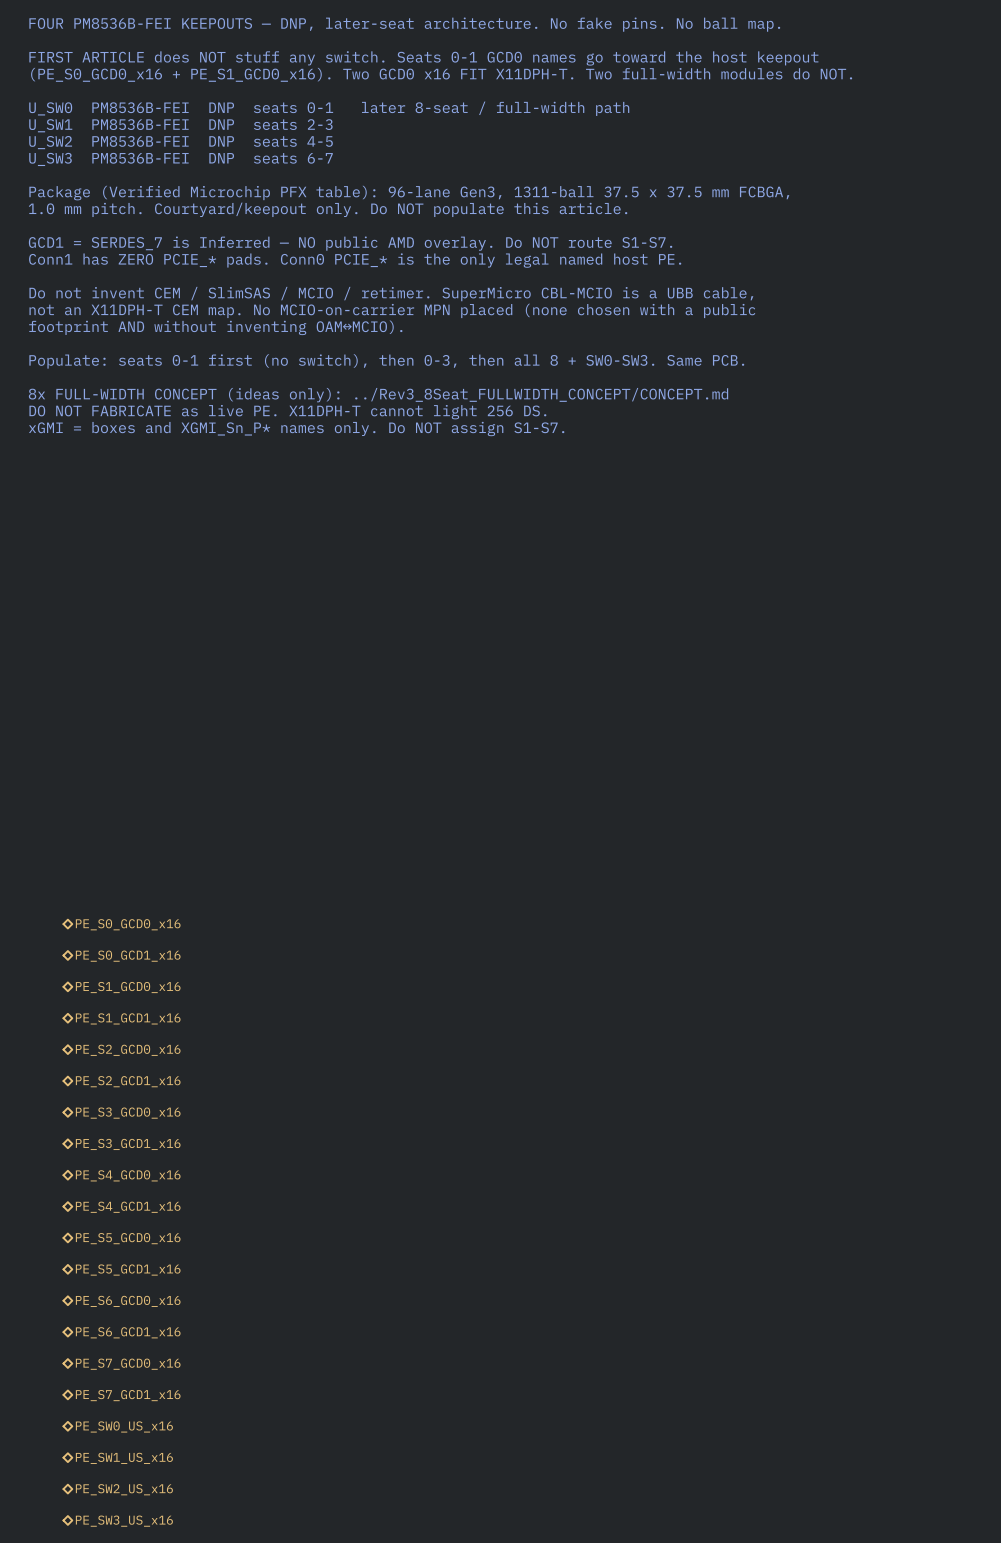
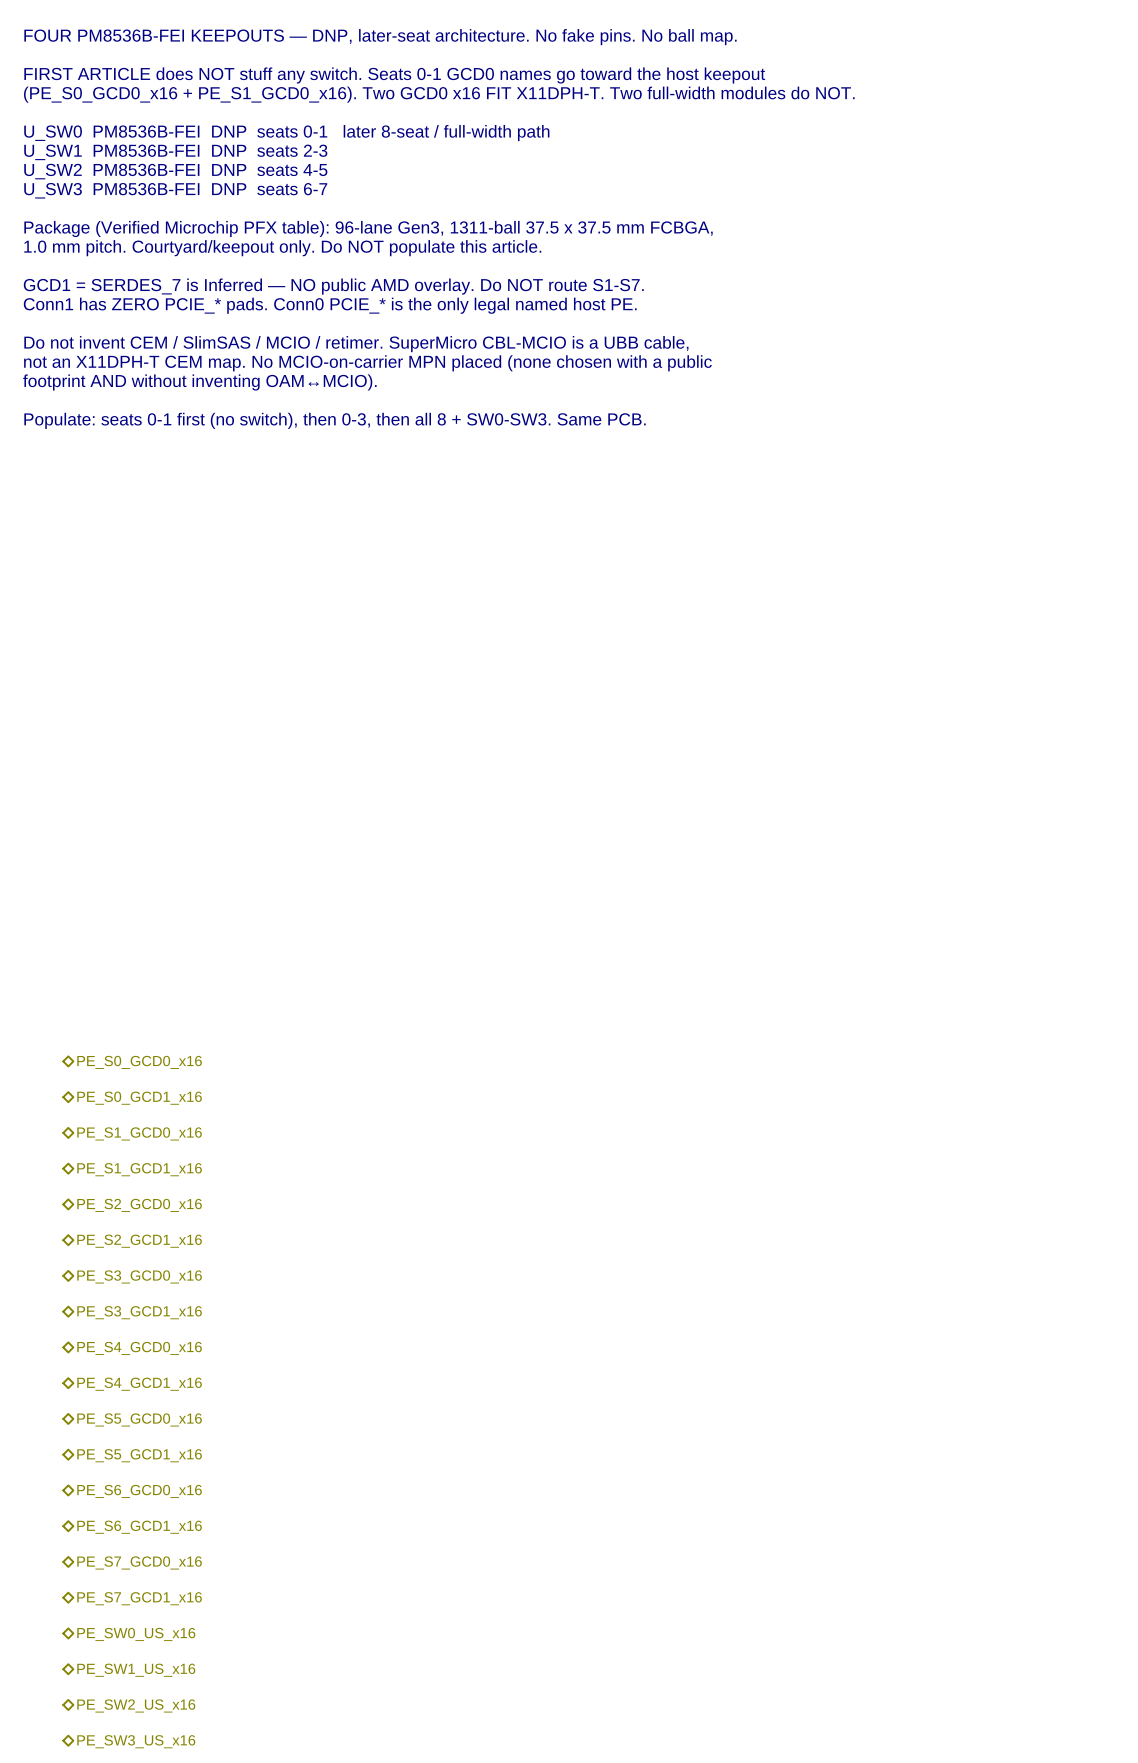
text: 8x FULL-WIDTH CONCEPT (ideas only): ../Rev3_8Seat_FULLWIDTH_CONCEPT/CONCEPT.md (378, 395) -> none
text: DO NOT FABRICATE as live PE. X11DPH-T cannot light 256 DS. (287, 412) -> none
text: xGMI = boxes and XGMI_Sn_P* names only. Do NOT assign S1-S7. (296, 429) -> none

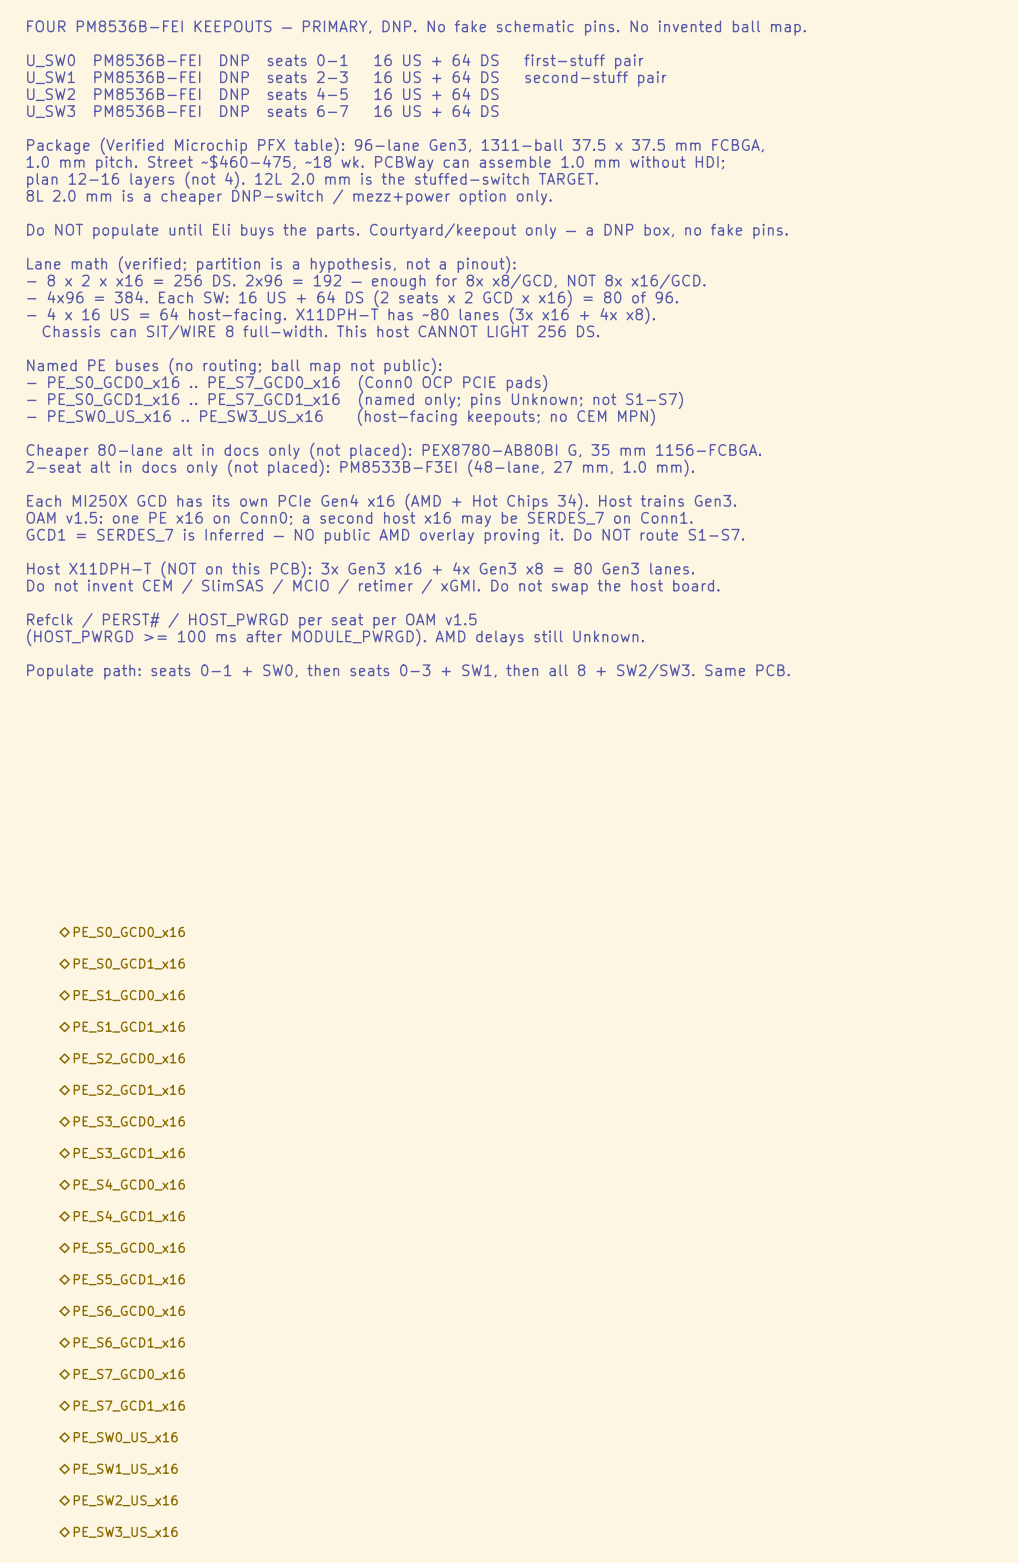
text: FOUR PM8536B-FEI KEEPOUTS — DNP, later-seat architecture. No fake pins. No ball map. (380, 37) -> FOUR PM8536B-FEI KEEPOUTS — PRIMARY, DNP. No fake schematic pins. No invented ball map. (416, 28)
text: FIRST ARTICLE does NOT stuff any switch. Seats 0-1 GCD0 names go toward the host keepout (394, 75) -> U_SW0 PM8536B-FEI DNP seats 0-1 16 US + 64 DS first-stuff pair (335, 61)
text: (PE_S0_GCD0_x16 + PE_S1_GCD0_x16). Two GCD0 x16 FIT X11DPH-T. Two full-width modules do NOT. (439, 94) -> U_SW1 PM8536B-FEI DNP seats 2-3 16 US + 64 DS second-stuff pair (346, 78)
text: none -> U_SW2 PM8536B-FEI DNP seats 4-5 16 US + 64 DS (262, 94)
text: U_SW0 PM8536B-FEI DNP seats 0-1 later 8-seat / full-width path (286, 133) -> U_SW3 PM8536B-FEI DNP seats 6-7 16 US + 64 DS (262, 111)
text: U_SW1 PM8536B-FEI DNP seats 2-3 (175, 152) -> none
text: U_SW2 PM8536B-FEI DNP seats 4-5 (175, 171) -> Package (Verified Microchip PFX table): 96-lane Gen3, 1311-ball 37.5 x 37.5 mm FCBGA, (395, 146)
text: U_SW3 PM8536B-FEI DNP seats 6-7 (175, 190) -> 1.0 mm pitch. Street ~$460-475, ~18 wk. PCBWay can assemble 1.0 mm without HDI; (375, 162)
text: none -> plan 12-16 layers (not 4). 12L 2.0 mm is the stuffed-switch TARGET. (312, 180)
text: Package (Verified Microchip PFX table): 96-lane Gen3, 1311-ball 37.5 x 37.5 mm FCBGA, (368, 228) -> 8L 2.0 mm is a cheaper DNP-switch / mezz+power option only. (289, 197)
text: 1.0 mm pitch. Courtyard/keepout only. Do NOT populate this article. (282, 248) -> none
text: none -> Do NOT populate until Eli buys the parts. Courtyard/keepout only — a DNP box, no fake pins. (407, 231)
text: GCD1 = SERDES_7 is Inferred — NO public AMD overlay. Do NOT route S1-S7. (333, 286) -> none
text: Conn1 has ZERO PCIE_* pads. Conn0 PCIE_* is the only legal named host PE. (330, 305) -> Lane math (verified; partition is a hypothesis, not a pinout): (271, 264)
text: none -> - 8 x 2 x x16 = 256 DS. 2x96 = 192 — enough for 8x x8/GCD, NOT 8x x16/GCD. (366, 282)
text: Do not invent CEM / SlimSAS / MCIO / retimer. SuperMicro CBL-MCIO is a UBB cable, (356, 344) -> - 4x96 = 384. Each SW: 16 US + 64 DS (2 seats x 2 GCD x x16) = 80 of 96. (352, 298)
text: not an X11DPH-T CEM map. No MCIO-on-carrier MPN placed (none chosen with a public (367, 363) -> - 4 x 16 US = 64 host-facing. X11DPH-T has ~80 lanes (3x x16 + 4x x8). (341, 315)
text: footprint AND without inventing OAM↔MCIO). (199, 382) -> Chassis can SIT/WIRE 8 full-width. This host CANNOT LIGHT 256 DS. (320, 332)
text: Populate: seats 0-1 first (no switch), then 0-3, then all 8 + SW0-SW3. Same PCB. (335, 420) -> Named PE buses (no routing; ball map not public): (234, 366)
text: none -> - PE_S0_GCD0_x16 .. PE_S7_GCD0_x16 (Conn0 OCP PCIE pads) (287, 383)
text: none -> - PE_S0_GCD1_x16 .. PE_S7_GCD1_x16 (named only; pins Unknown; not S1-S7) (355, 400)
text: none -> - PE_SW0_US_x16 .. PE_SW3_US_x16 (host-facing keepouts; no CEM MPN) (341, 417)
text: none -> Cheaper 80-lane alt in docs only (not placed): PEX8780-AB80BI G, 35 mm 1156-FCBGA. (393, 451)
text: none -> 2-seat alt in docs only (not placed): PM8533B-F3EI (48-lane, 27 mm, 1.0 mm). (360, 468)
text: none -> Each MI250X GCD has its own PCIe Gen4 x16 (AMD + Hot Chips 34). Host trains Gen3. (381, 502)
text: none -> OAM v1.5: one PE x16 on Conn0; a second host x16 may be SERDES_7 on Conn1. (359, 519)
text: none -> GCD1 = SERDES_7 is Inferred — NO public AMD overlay proving it. Do NOT route S1-S7. (385, 536)
text: none -> Host X11DPH-T (NOT on this PCB): 3x Gen3 x16 + 4x Gen3 x8 = 80 Gen3 lanes. (360, 569)
text: none -> Do not invent CEM / SlimSAS / MCIO / retimer / xGMI. Do not swap the host board. (373, 587)
text: none -> Refclk / PERST# / HOST_PWRGD per seat per OAM v1.5 (251, 620)
text: none -> (HOST_PWRGD >= 100 ms after MODULE_PWRGD). AMD delays still Unknown. (335, 637)
text: none -> Populate path: seats 0-1 + SW0, then seats 0-3 + SW1, then all 8 + SW2/SW3. Same PCB. (408, 671)

